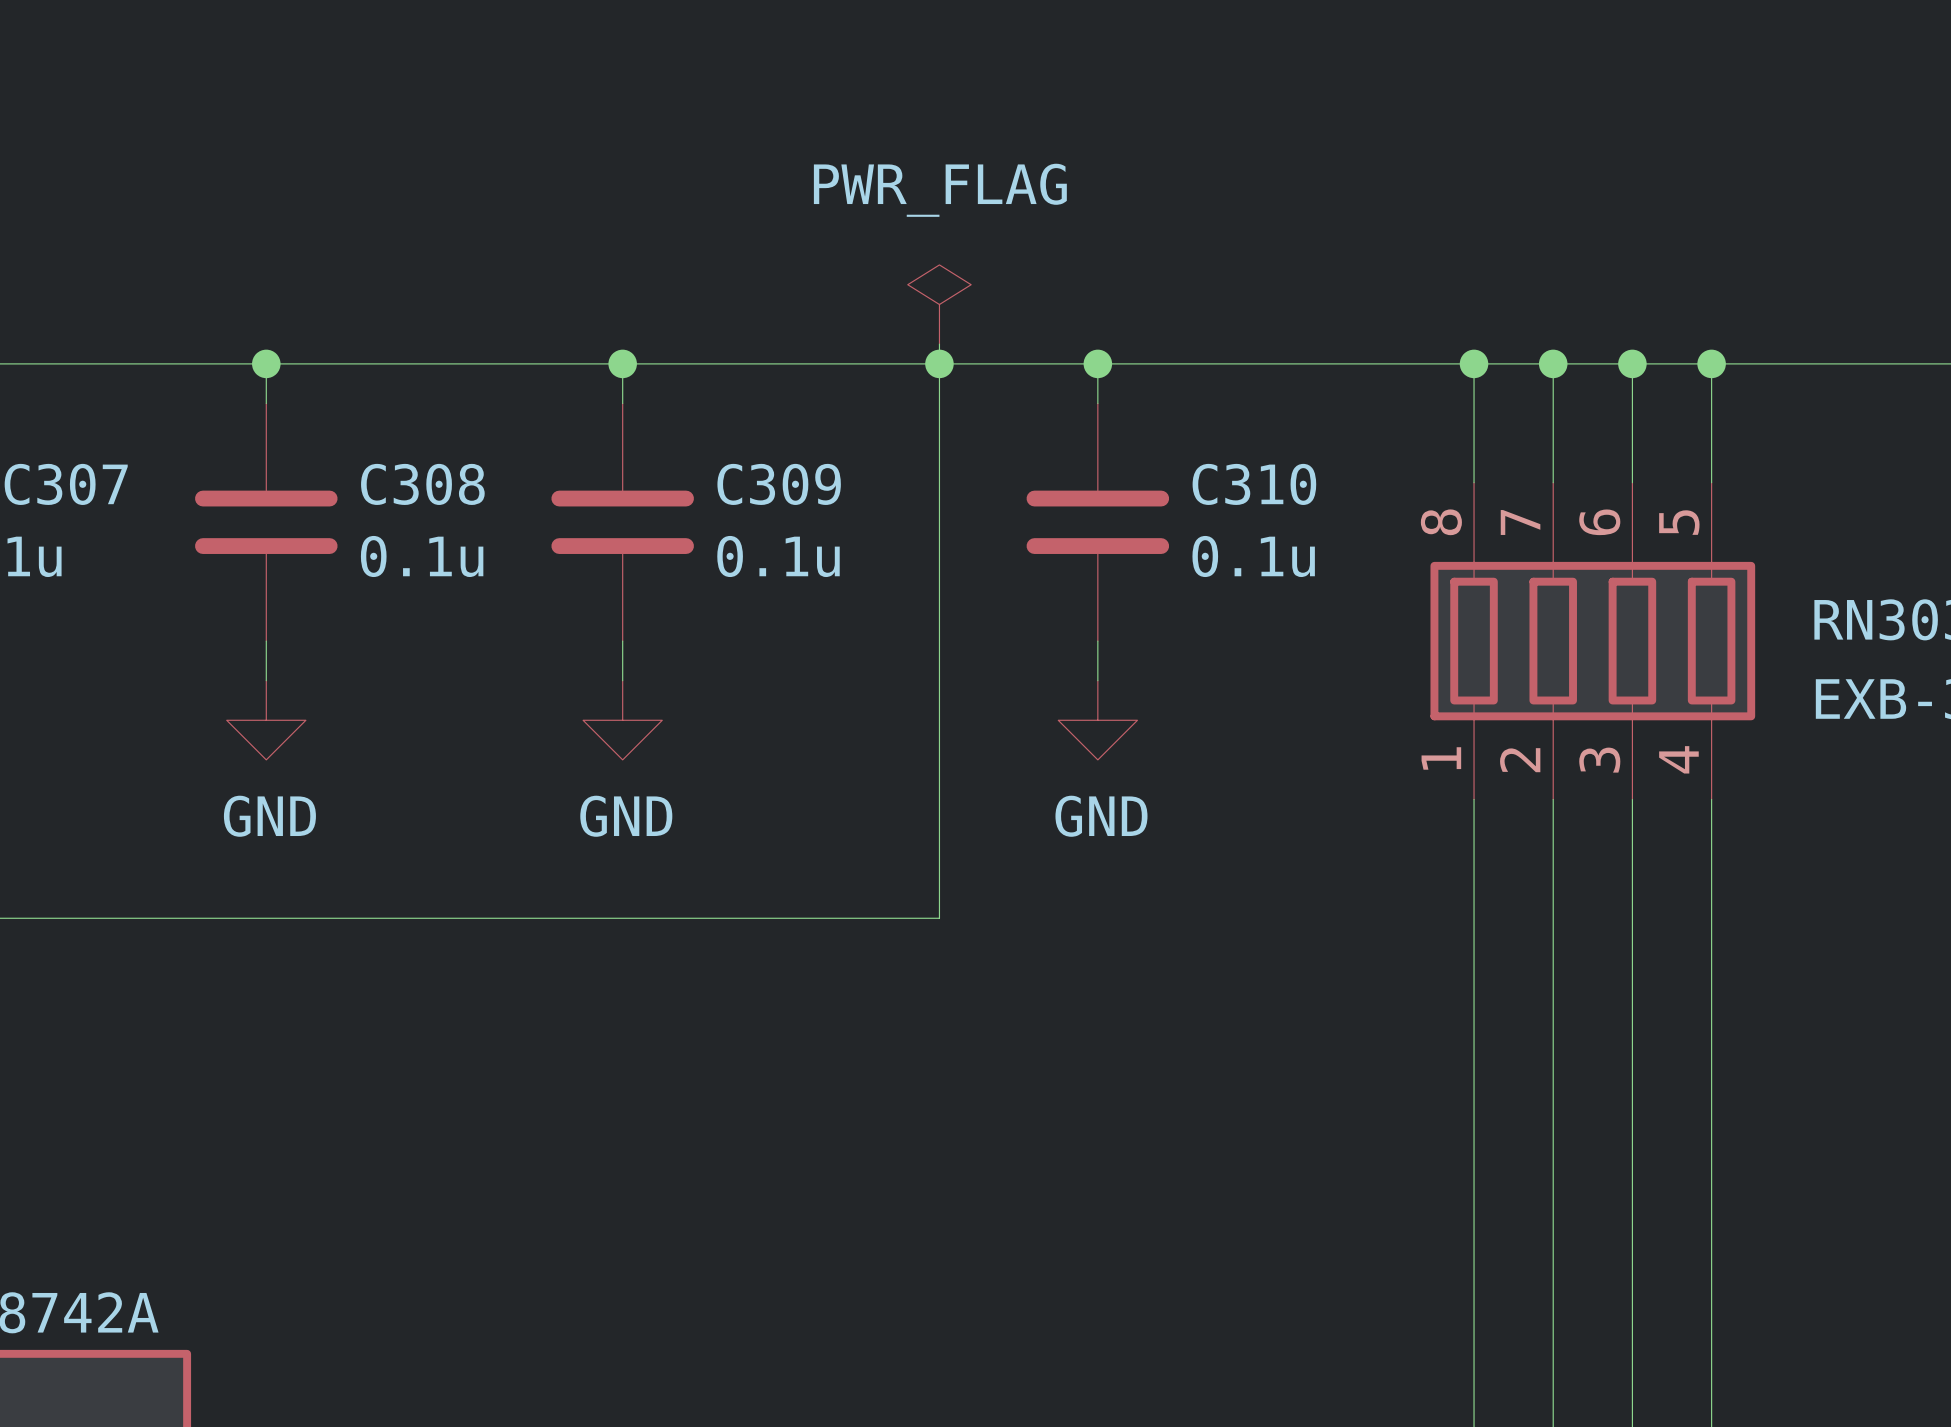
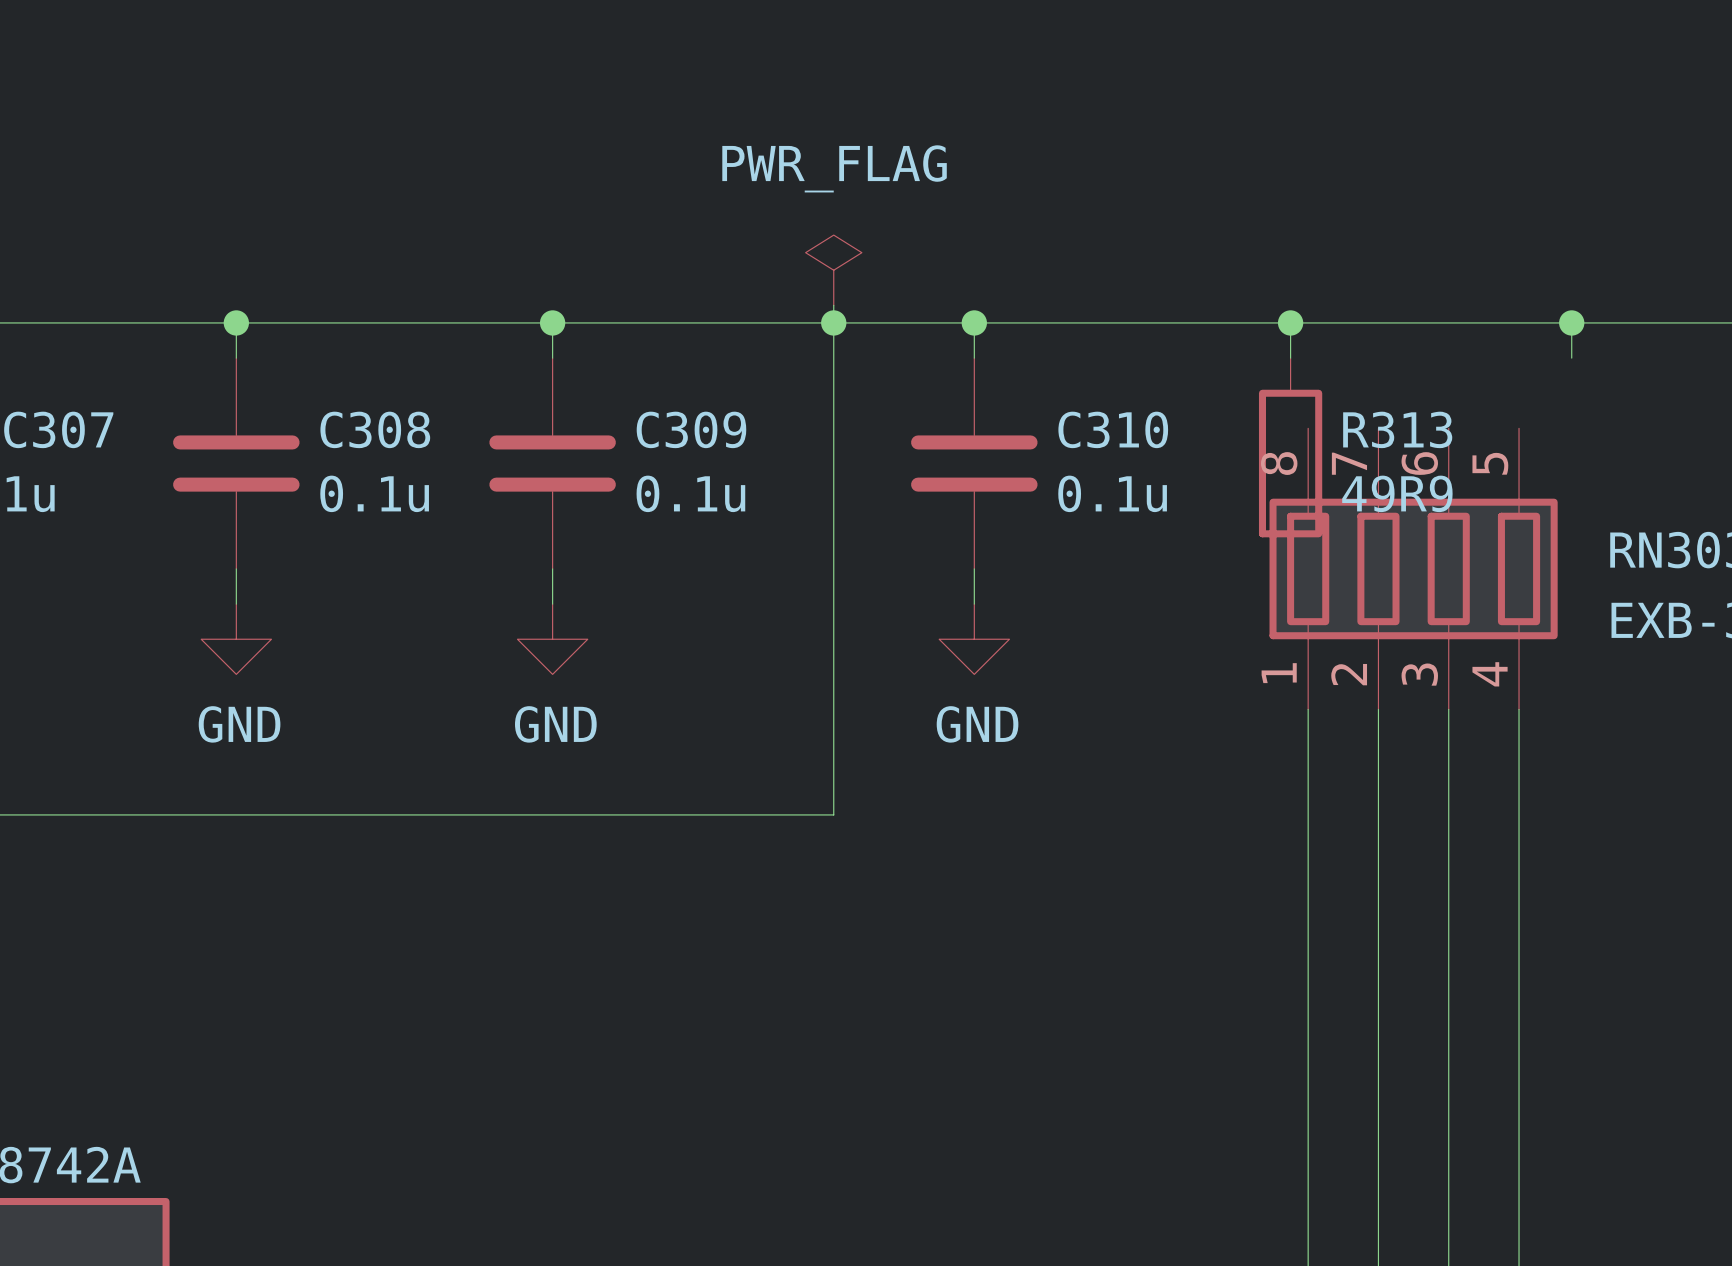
wire: none -> (1290, 322) (1290, 358)
wire: (1474, 363) (1474, 482) -> none
junction position: (1474, 363) -> (1290, 322)
wire: (1553, 363) (1553, 482) -> none
junction: (1553, 363) -> none
wire: (1632, 363) (1632, 482) -> none
junction: (1632, 363) -> none
wire: (1711, 363) (1711, 482) -> none
junction position: (1711, 363) -> (1571, 322)
wire: none -> (1571, 322) (1571, 358)
R313: none -> 49R9 (1290, 463)

